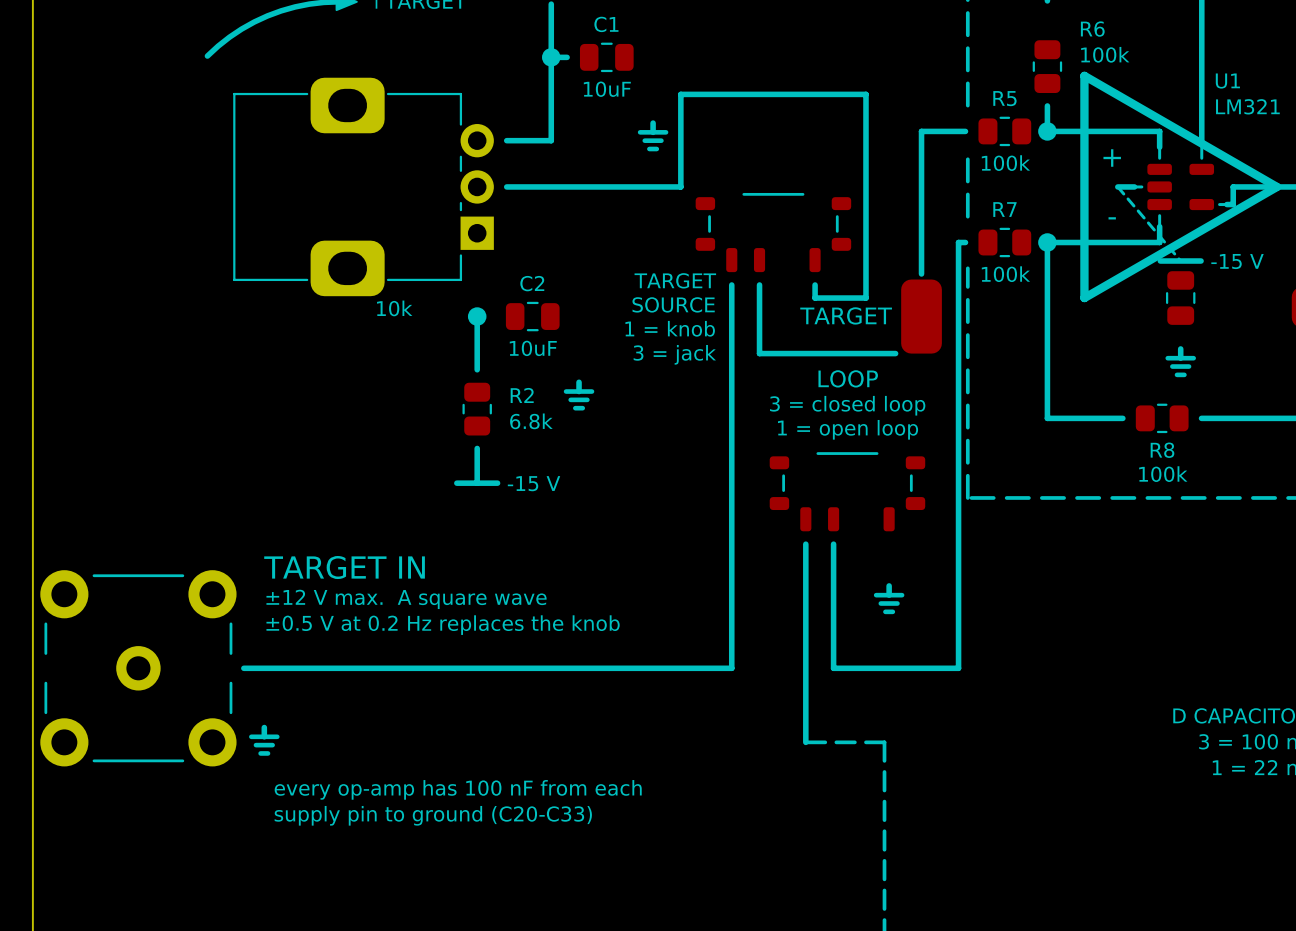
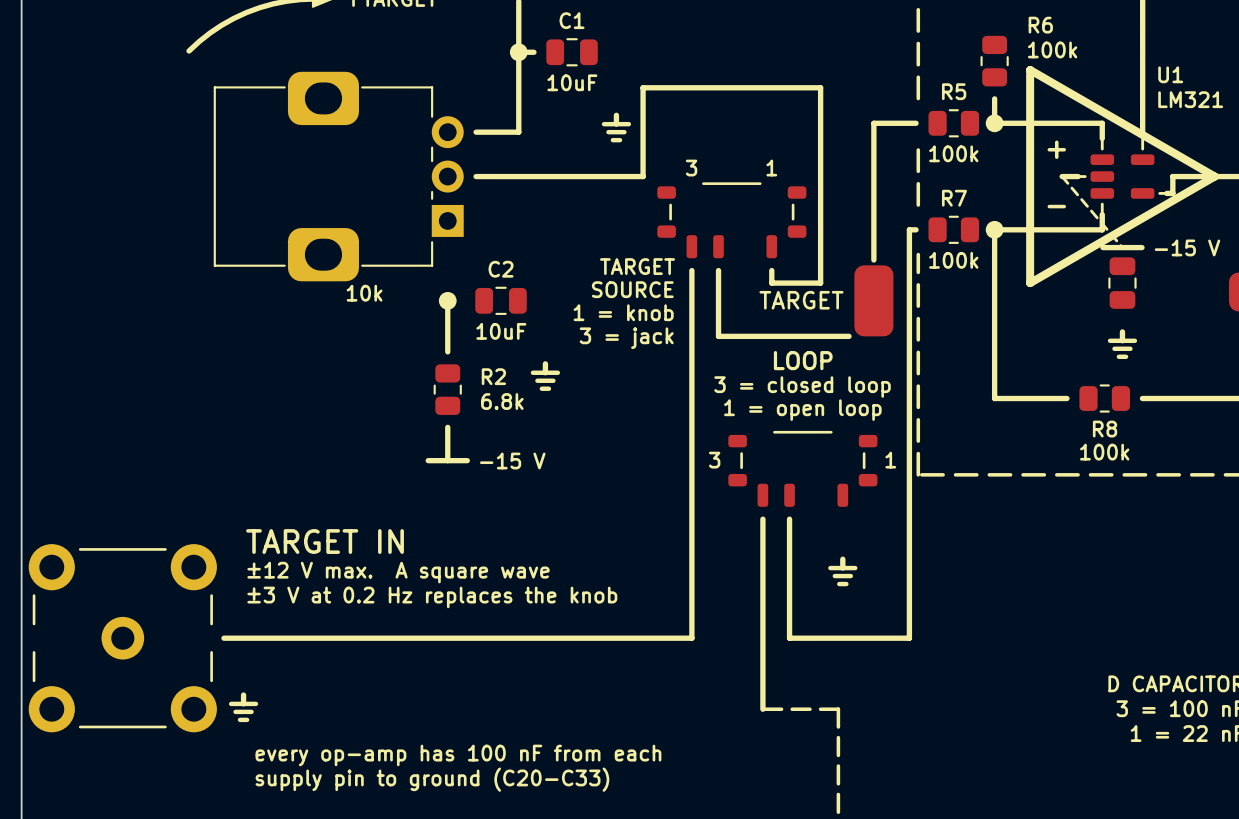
text: none -> 3 (691, 168)
text: none -> 1 (771, 168)
text: none -> 3 (714, 460)
text: none -> 1 (890, 460)
text: ±0.5 V at 0.2 Hz replaces the knob (443, 625) -> ±3 V at 0.2 Hz replaces the knob (432, 597)

